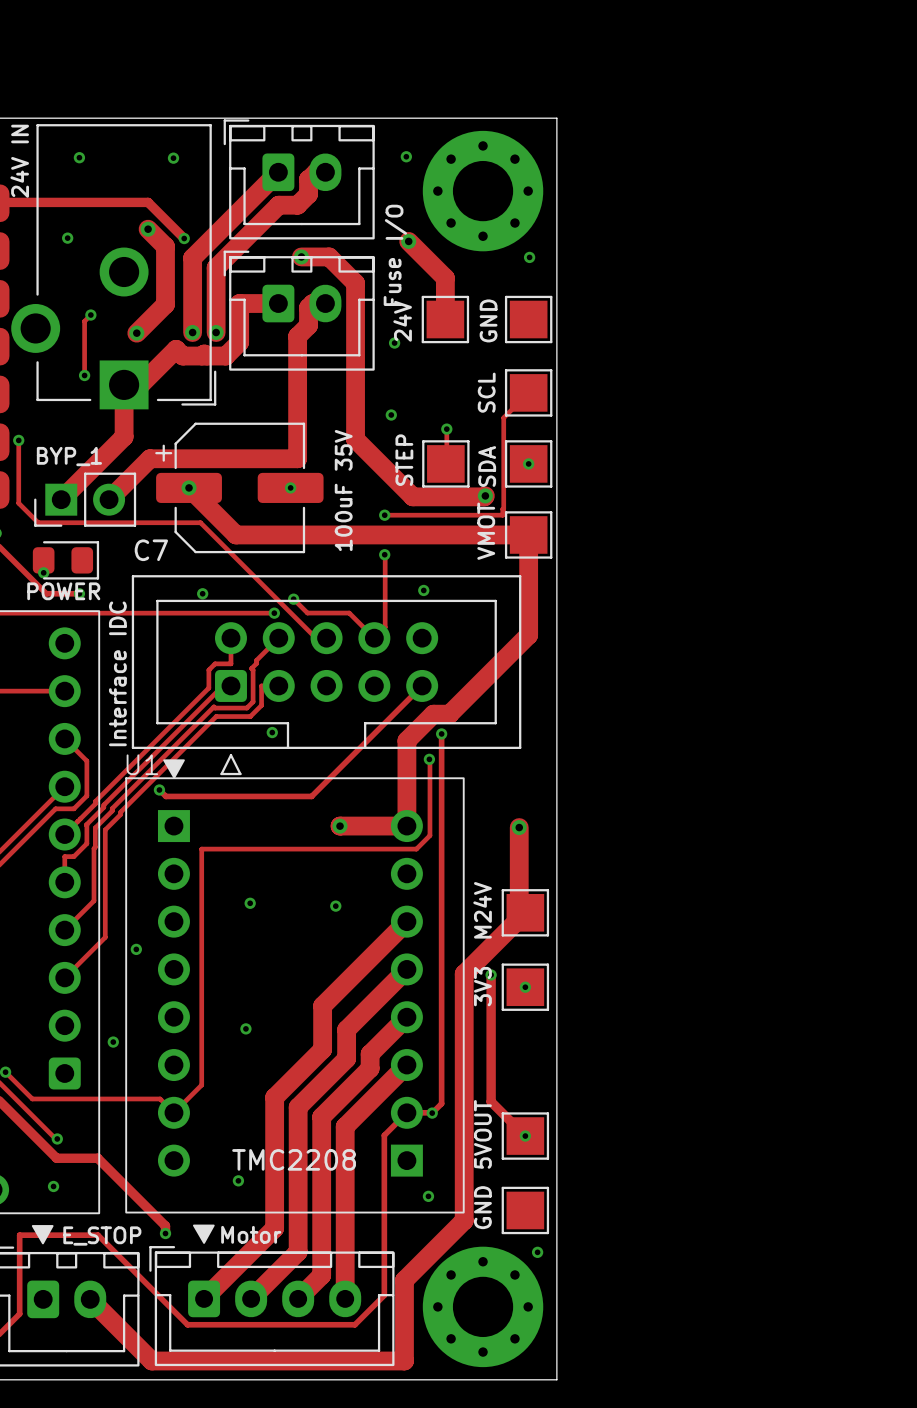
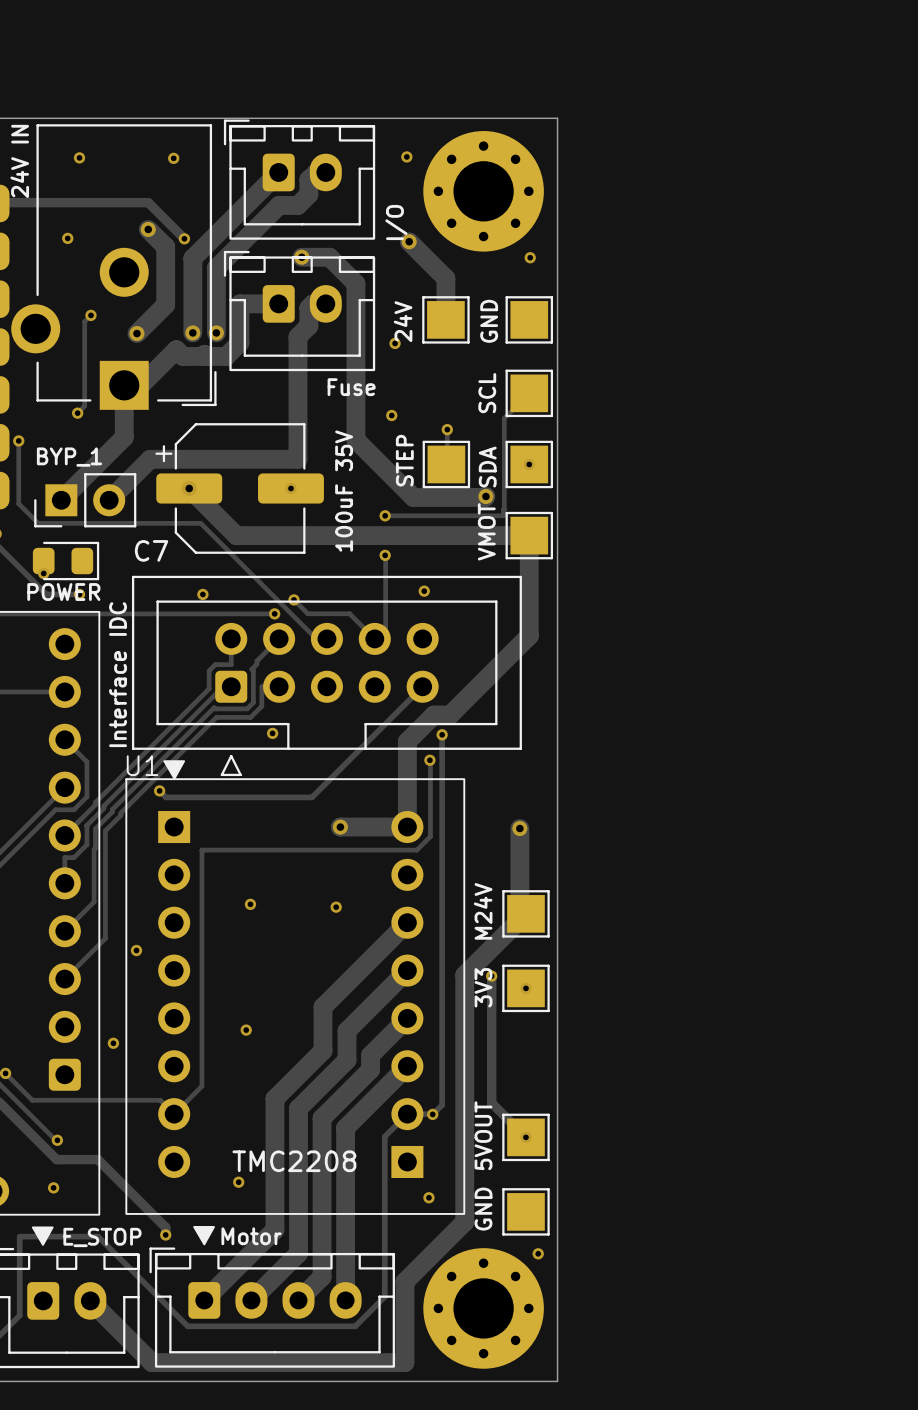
part value rotation: 0° (392, 281) -> 90° clockwise (351, 387)
part value position: Fuse (392, 281) -> Fuse (351, 387)
track: none -> (84, 375) (84, 406) (77, 413)
via position: (84, 375) -> (77, 413)

